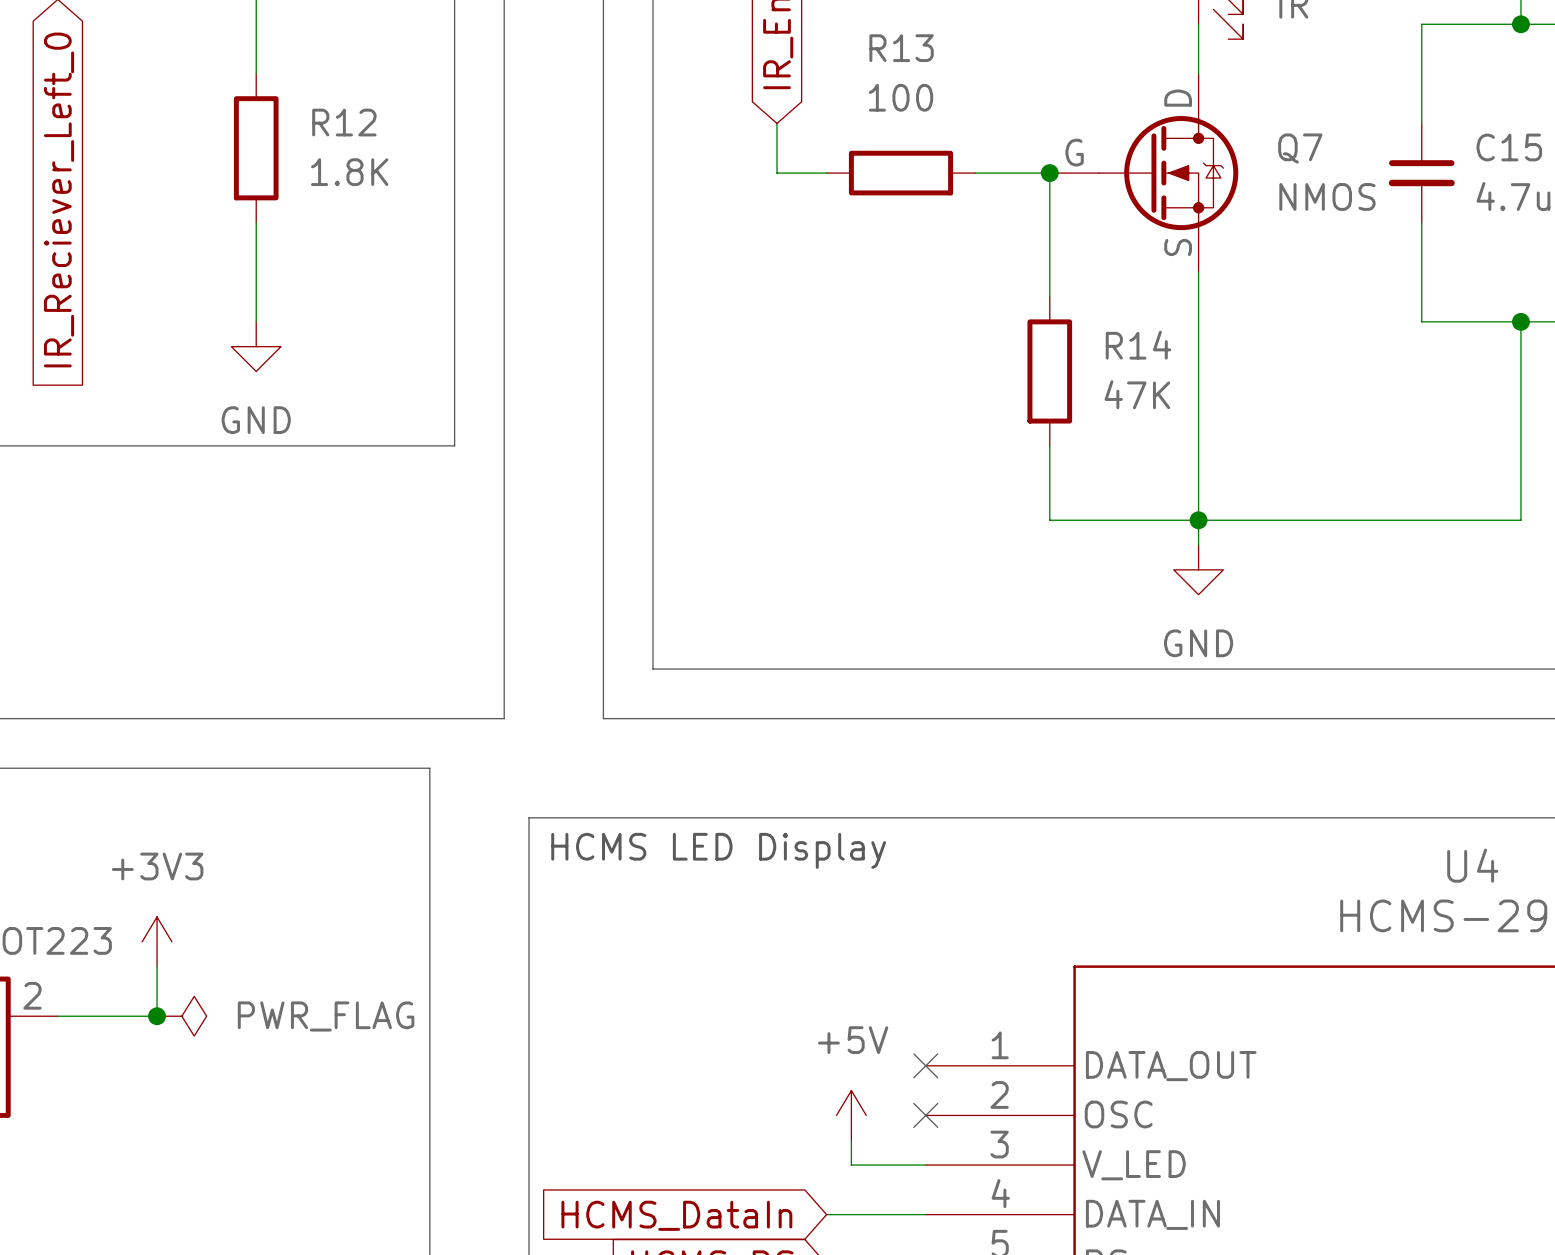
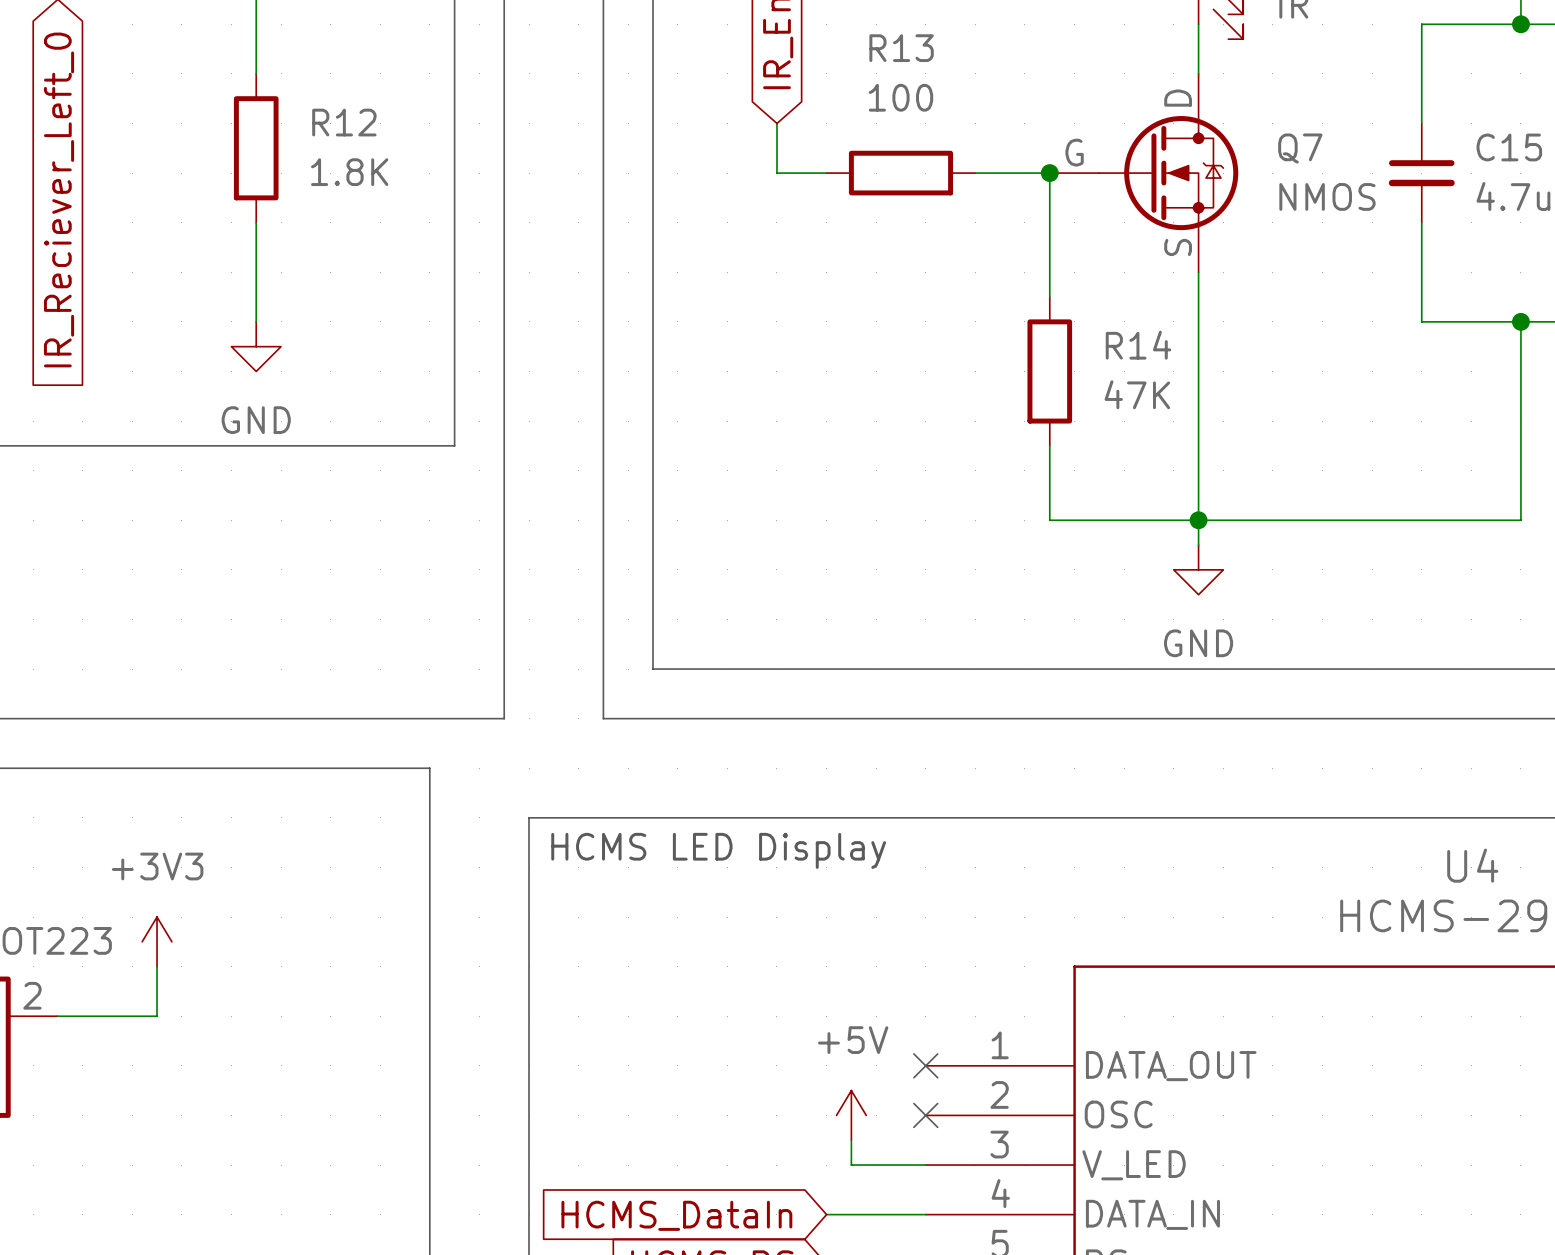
junction: (157, 1016) -> none
power symbol: PWR_FLAG (181, 1016) -> none

